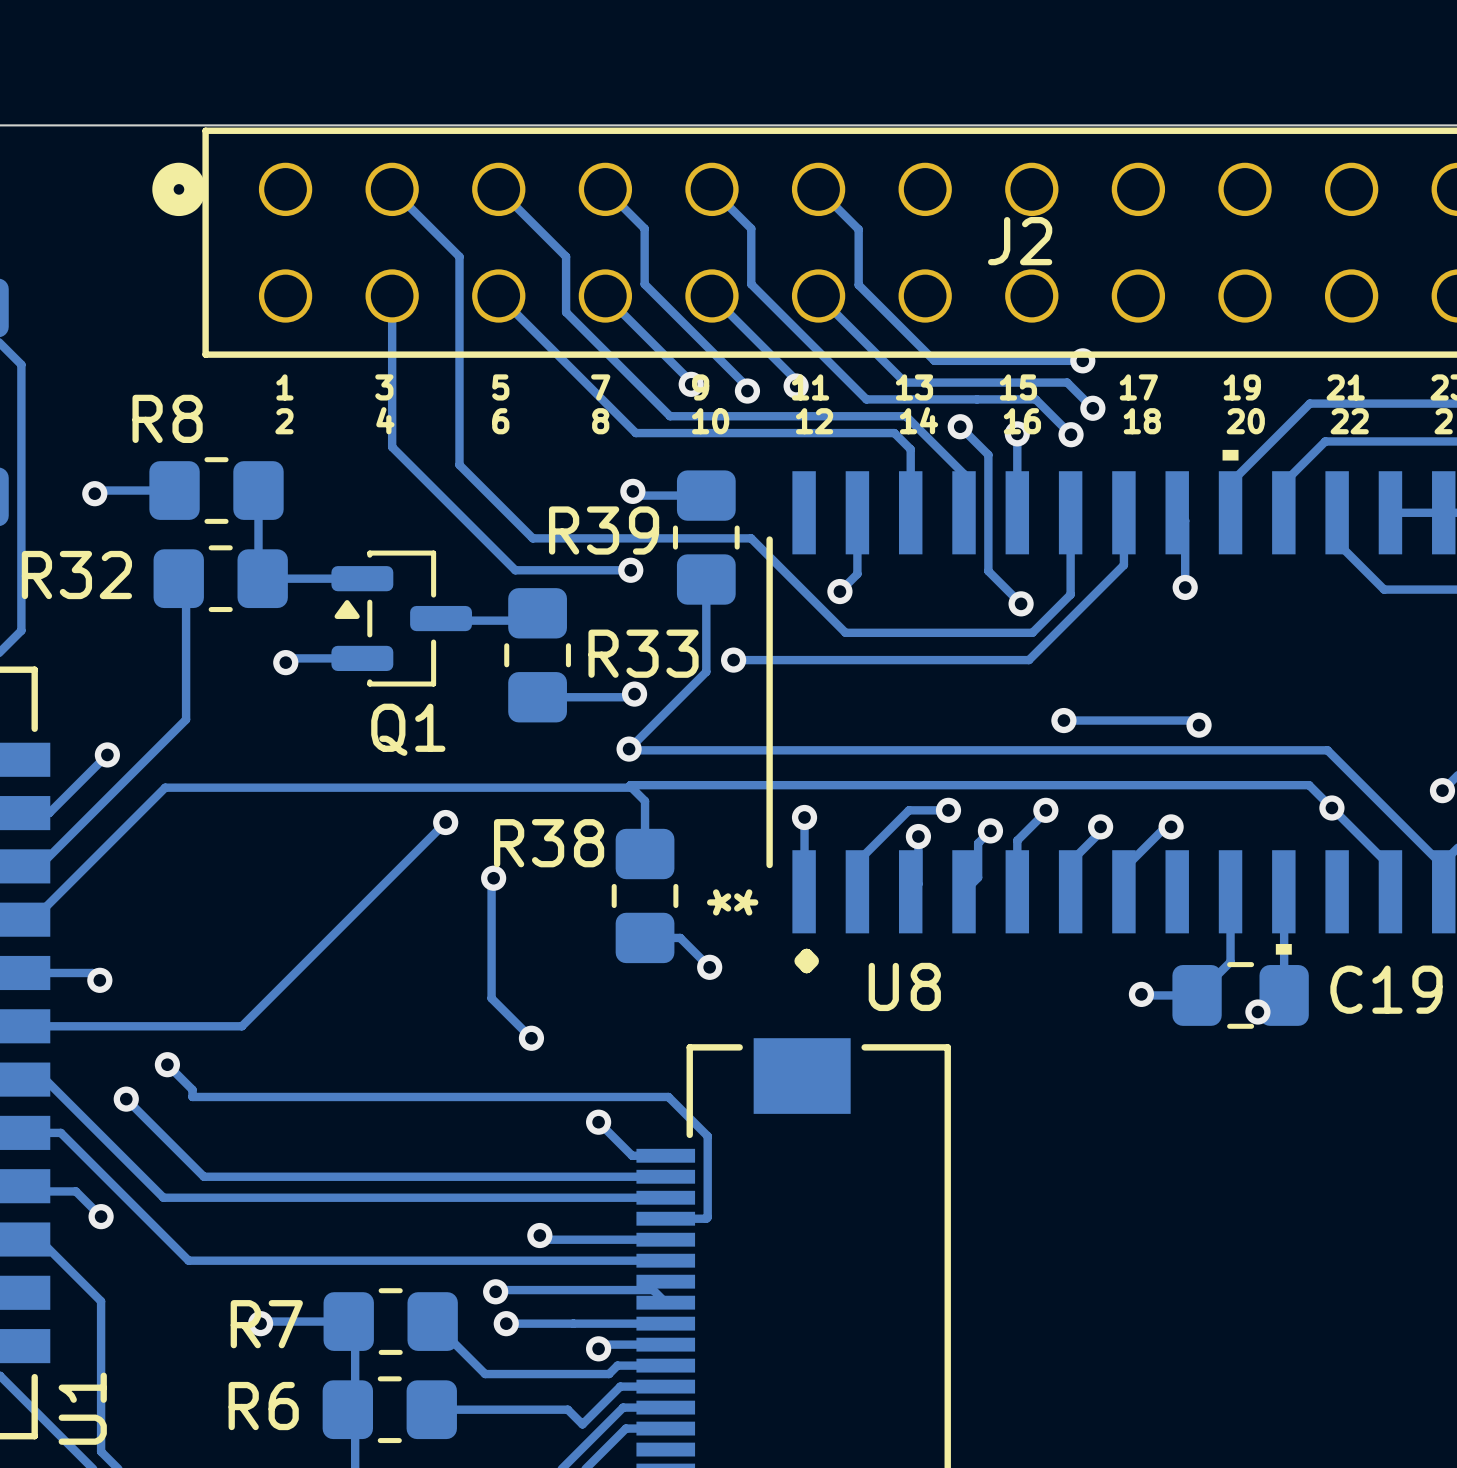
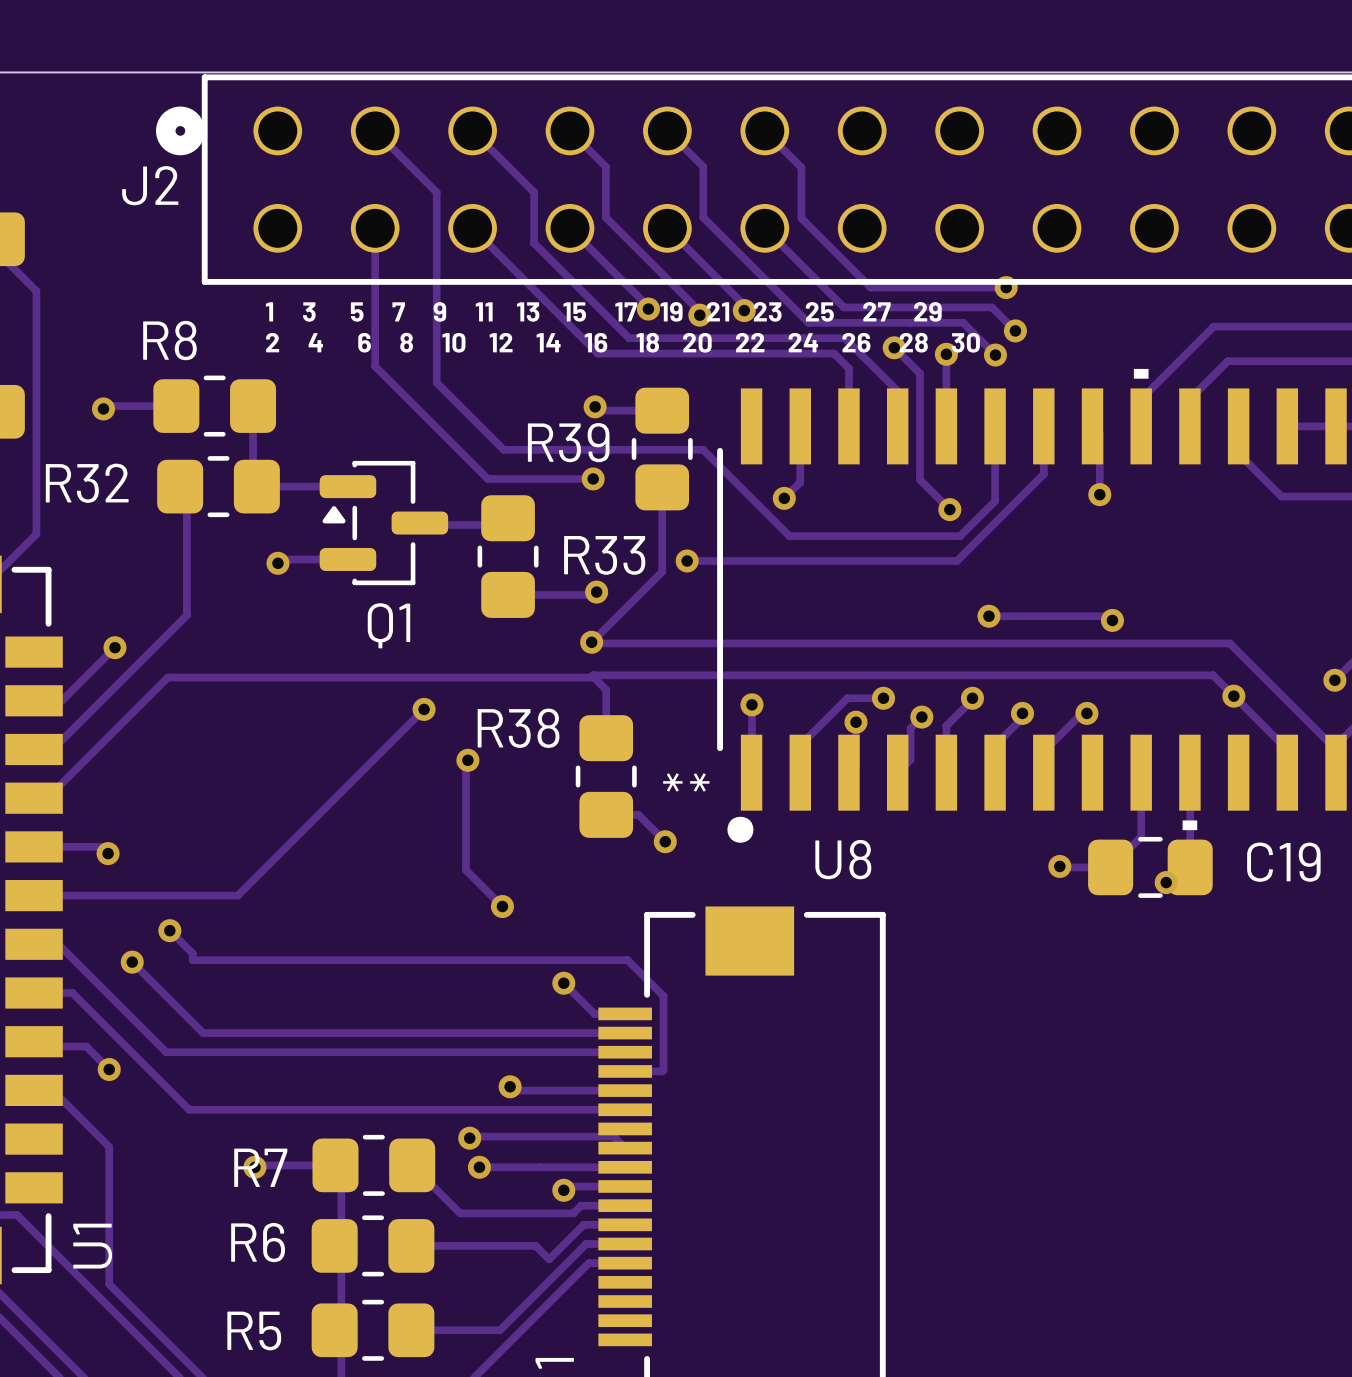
J2 name position: J2 (1020, 241) -> J2 (150, 185)

